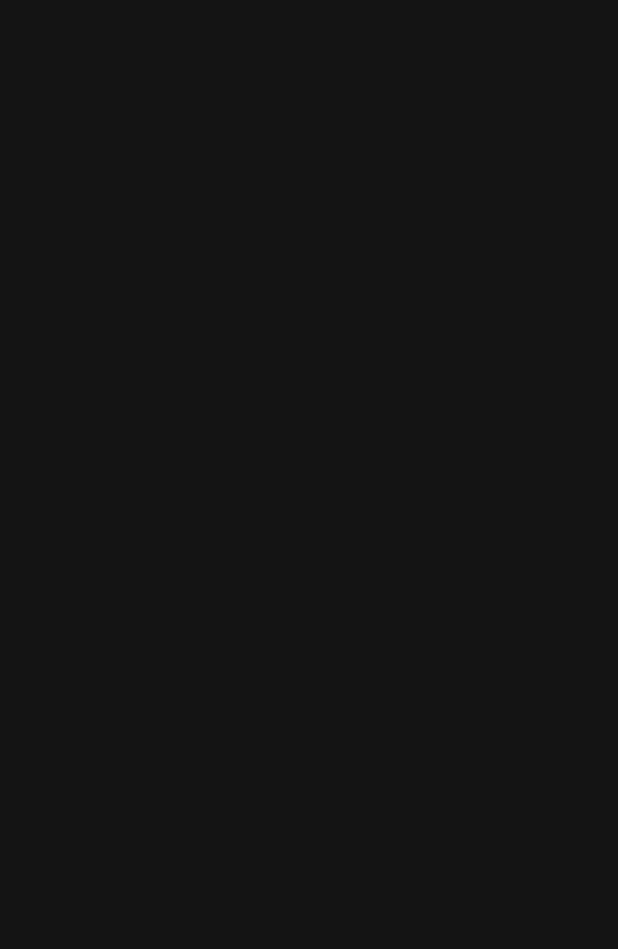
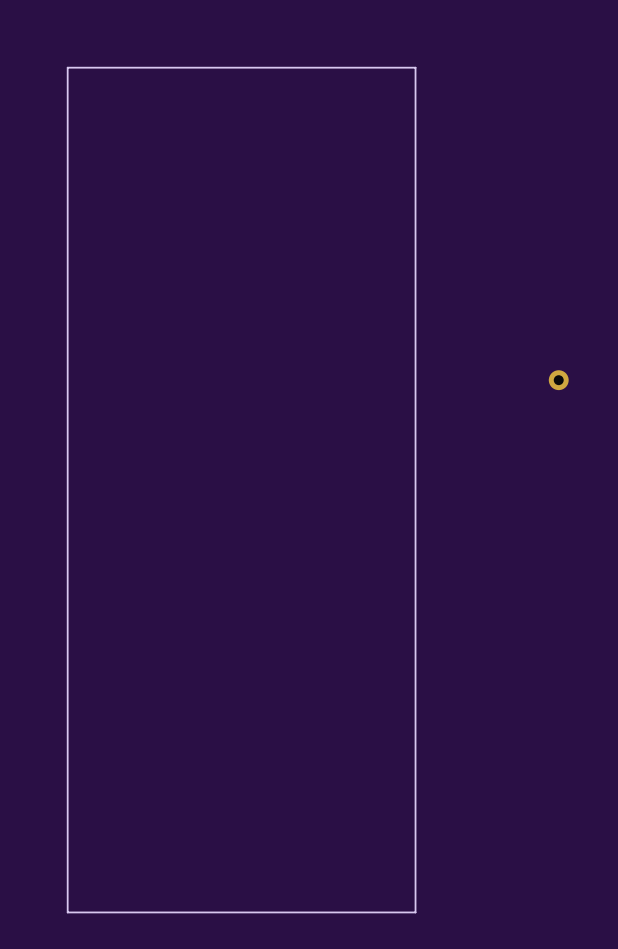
board edge: none -> (415, 67) (67, 67) (67, 912) (415, 912) (415, 67)
via: none -> (558, 380)

